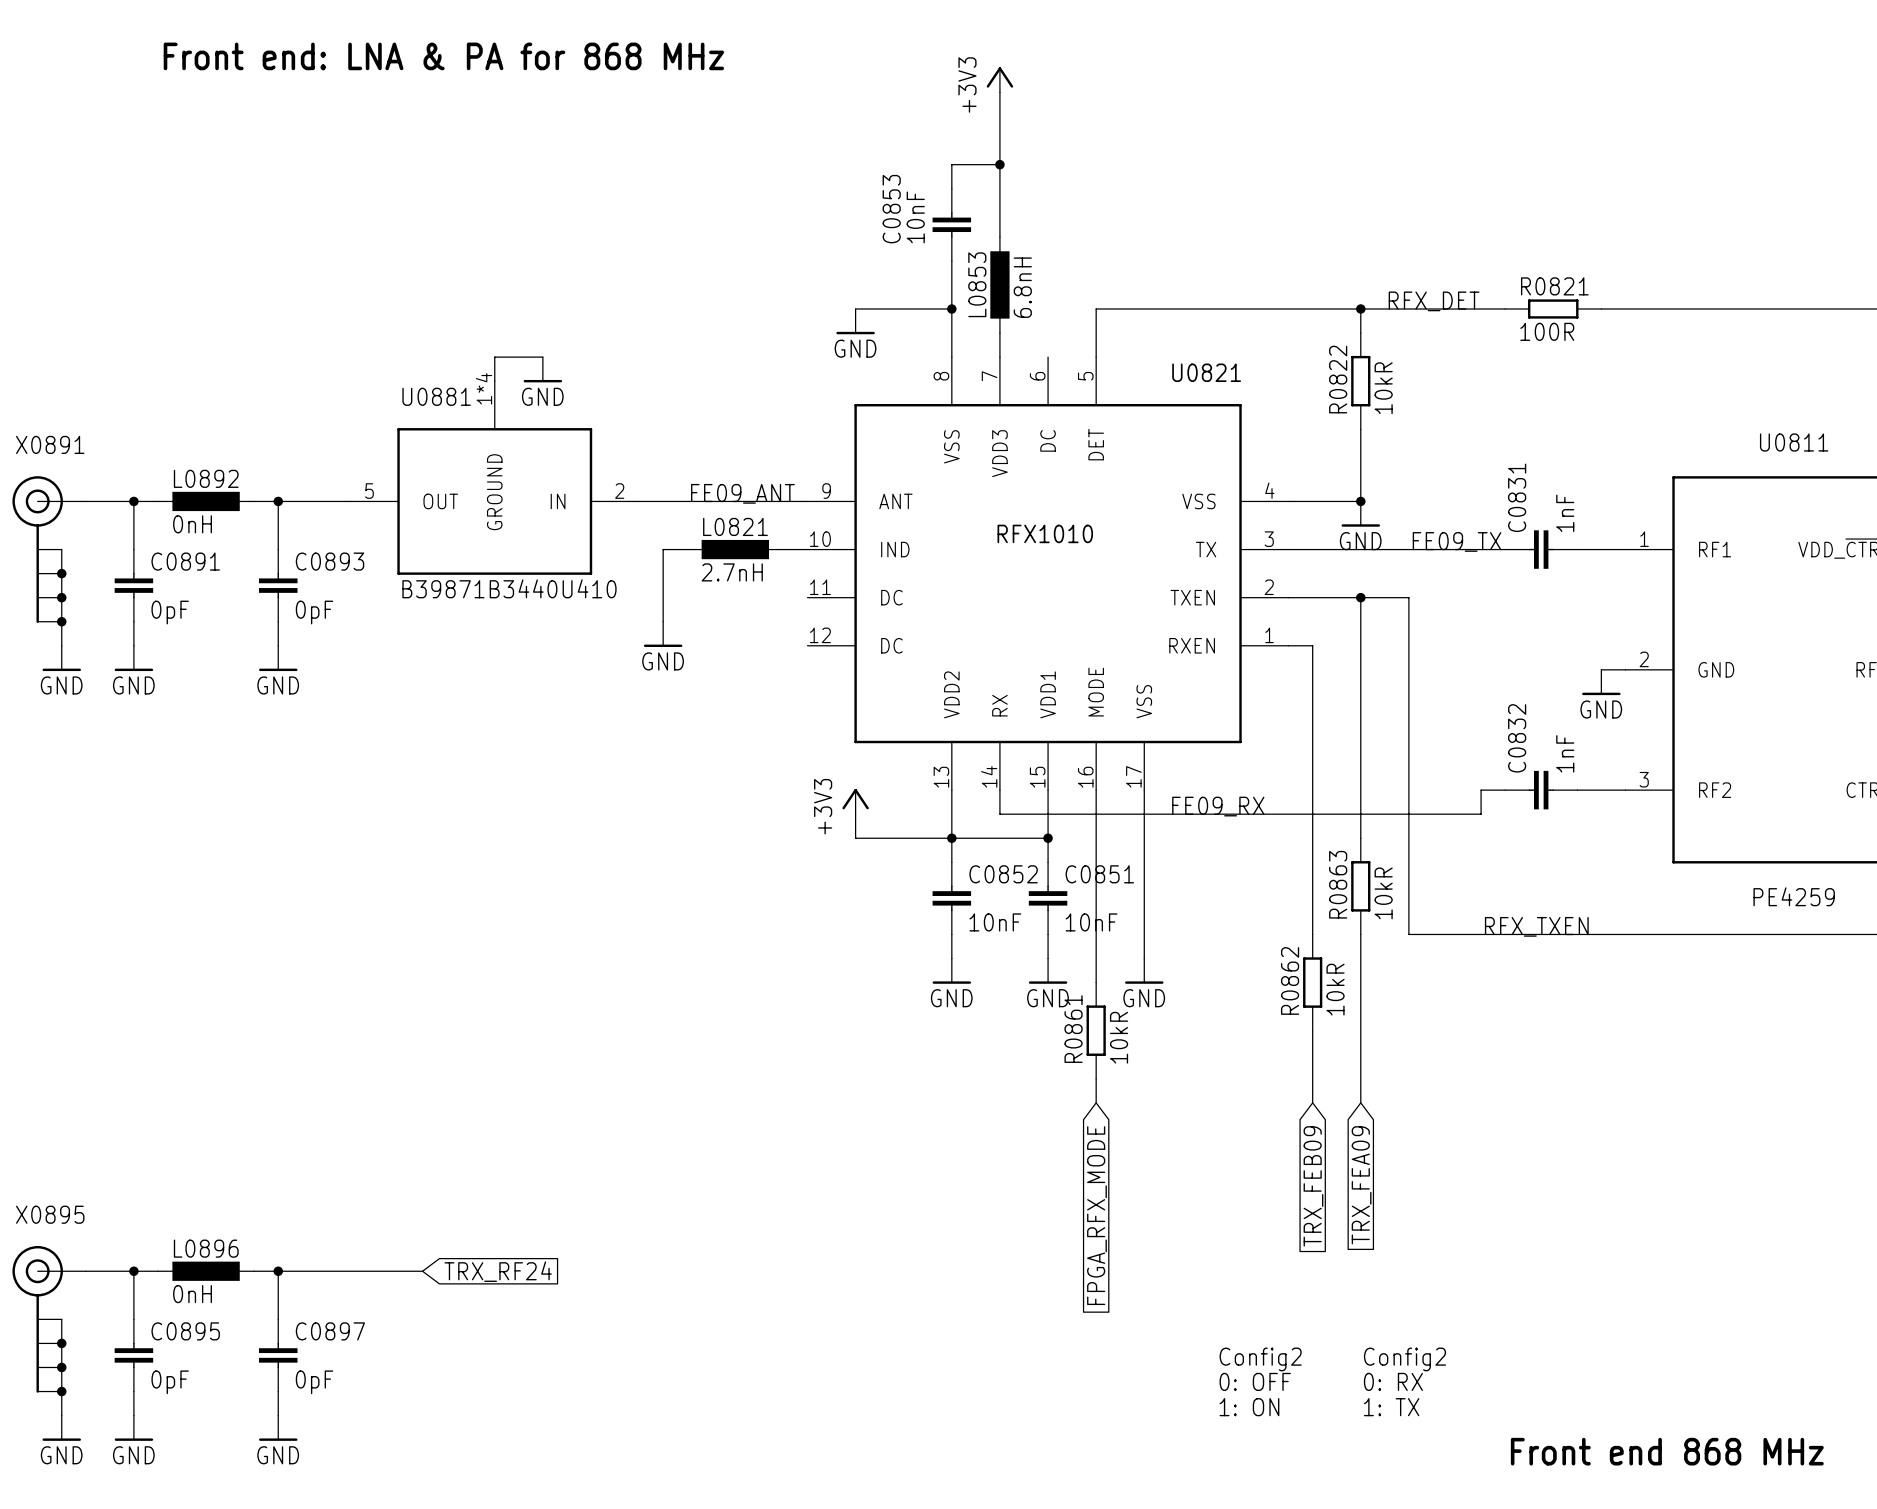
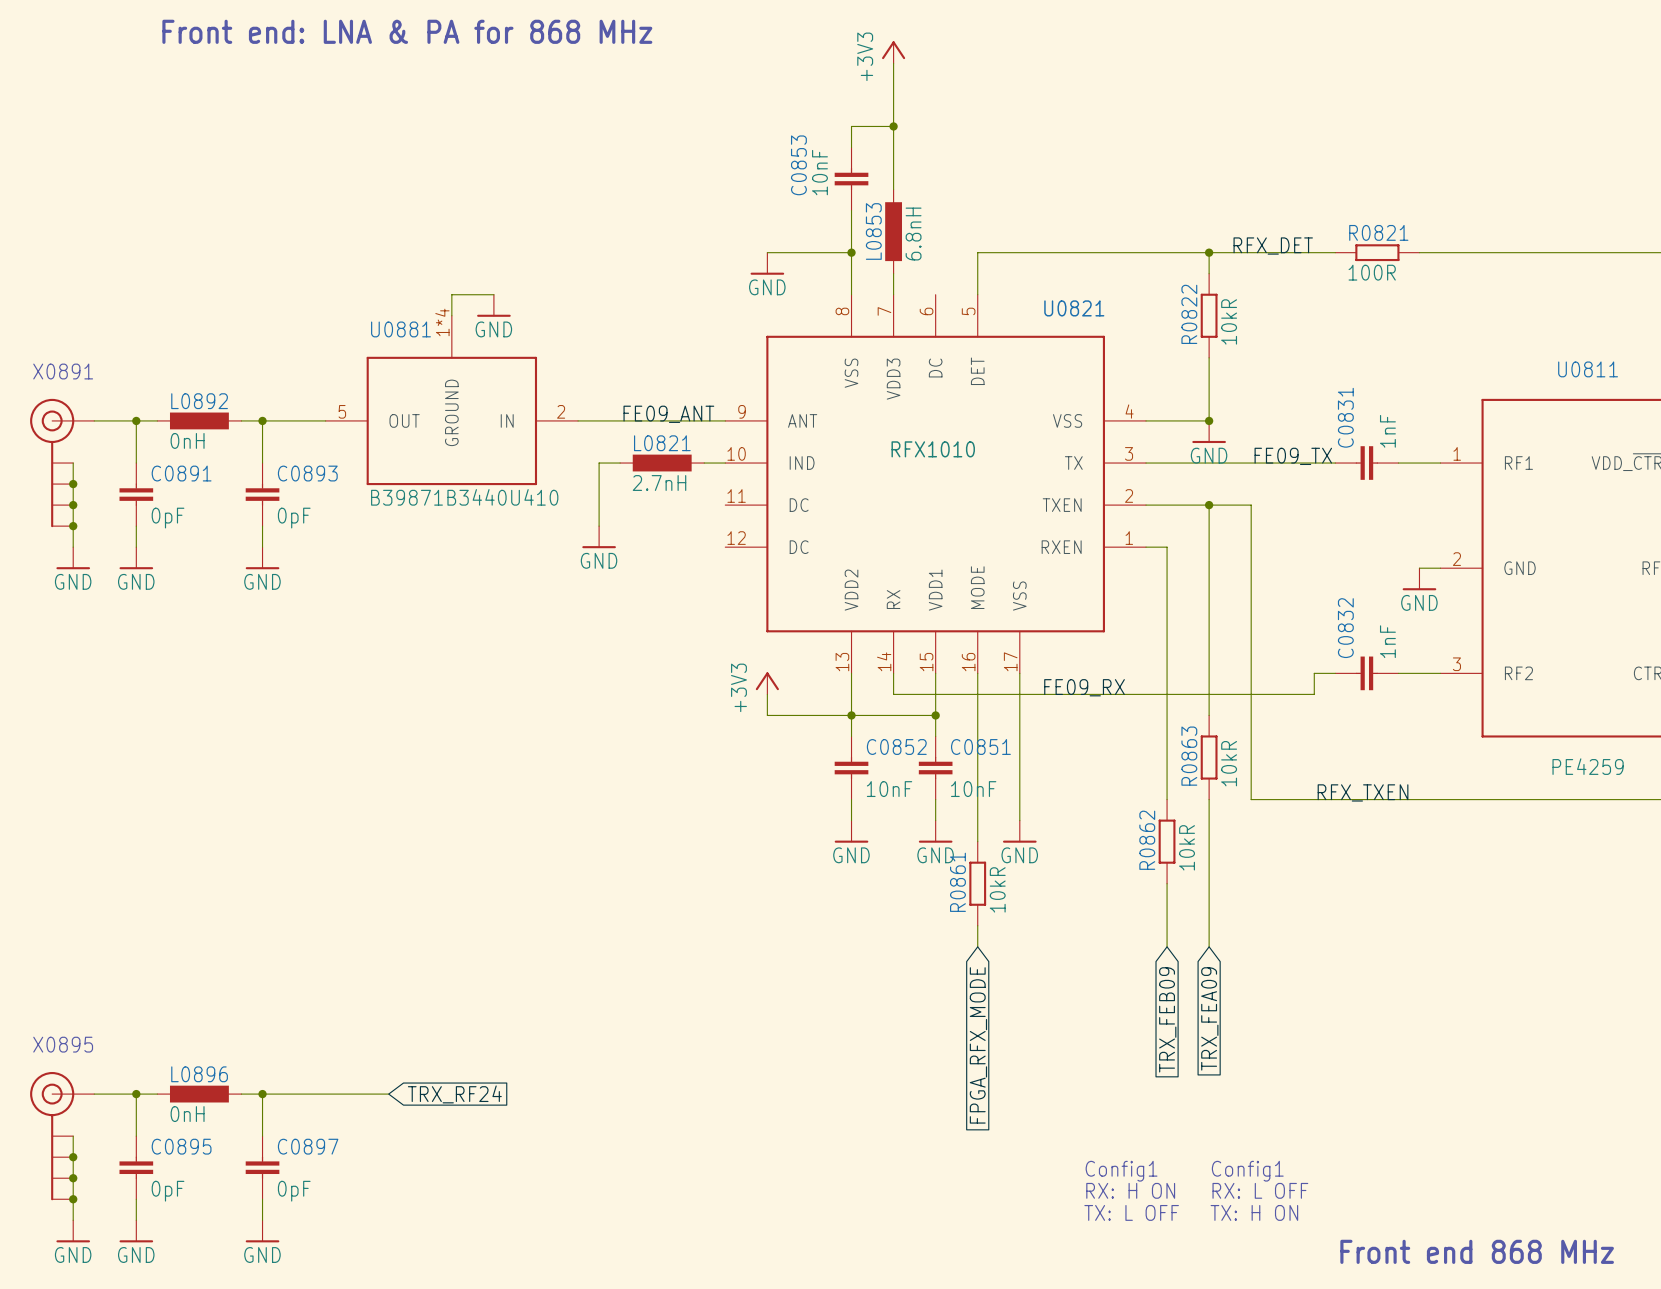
text: Config2 (1260, 1359) -> Config1 (1121, 1171)
text: Config2 (1404, 1359) -> Config1 (1247, 1171)
text: 0: OFF (1255, 1381) -> RX: H ON (1130, 1190)
text: 0: RX (1393, 1381) -> RX: L OFF (1260, 1190)
text: 1: ON (1249, 1407) -> TX: L OFF (1131, 1212)
text: 1: TX (1391, 1407) -> TX: H ON (1254, 1212)

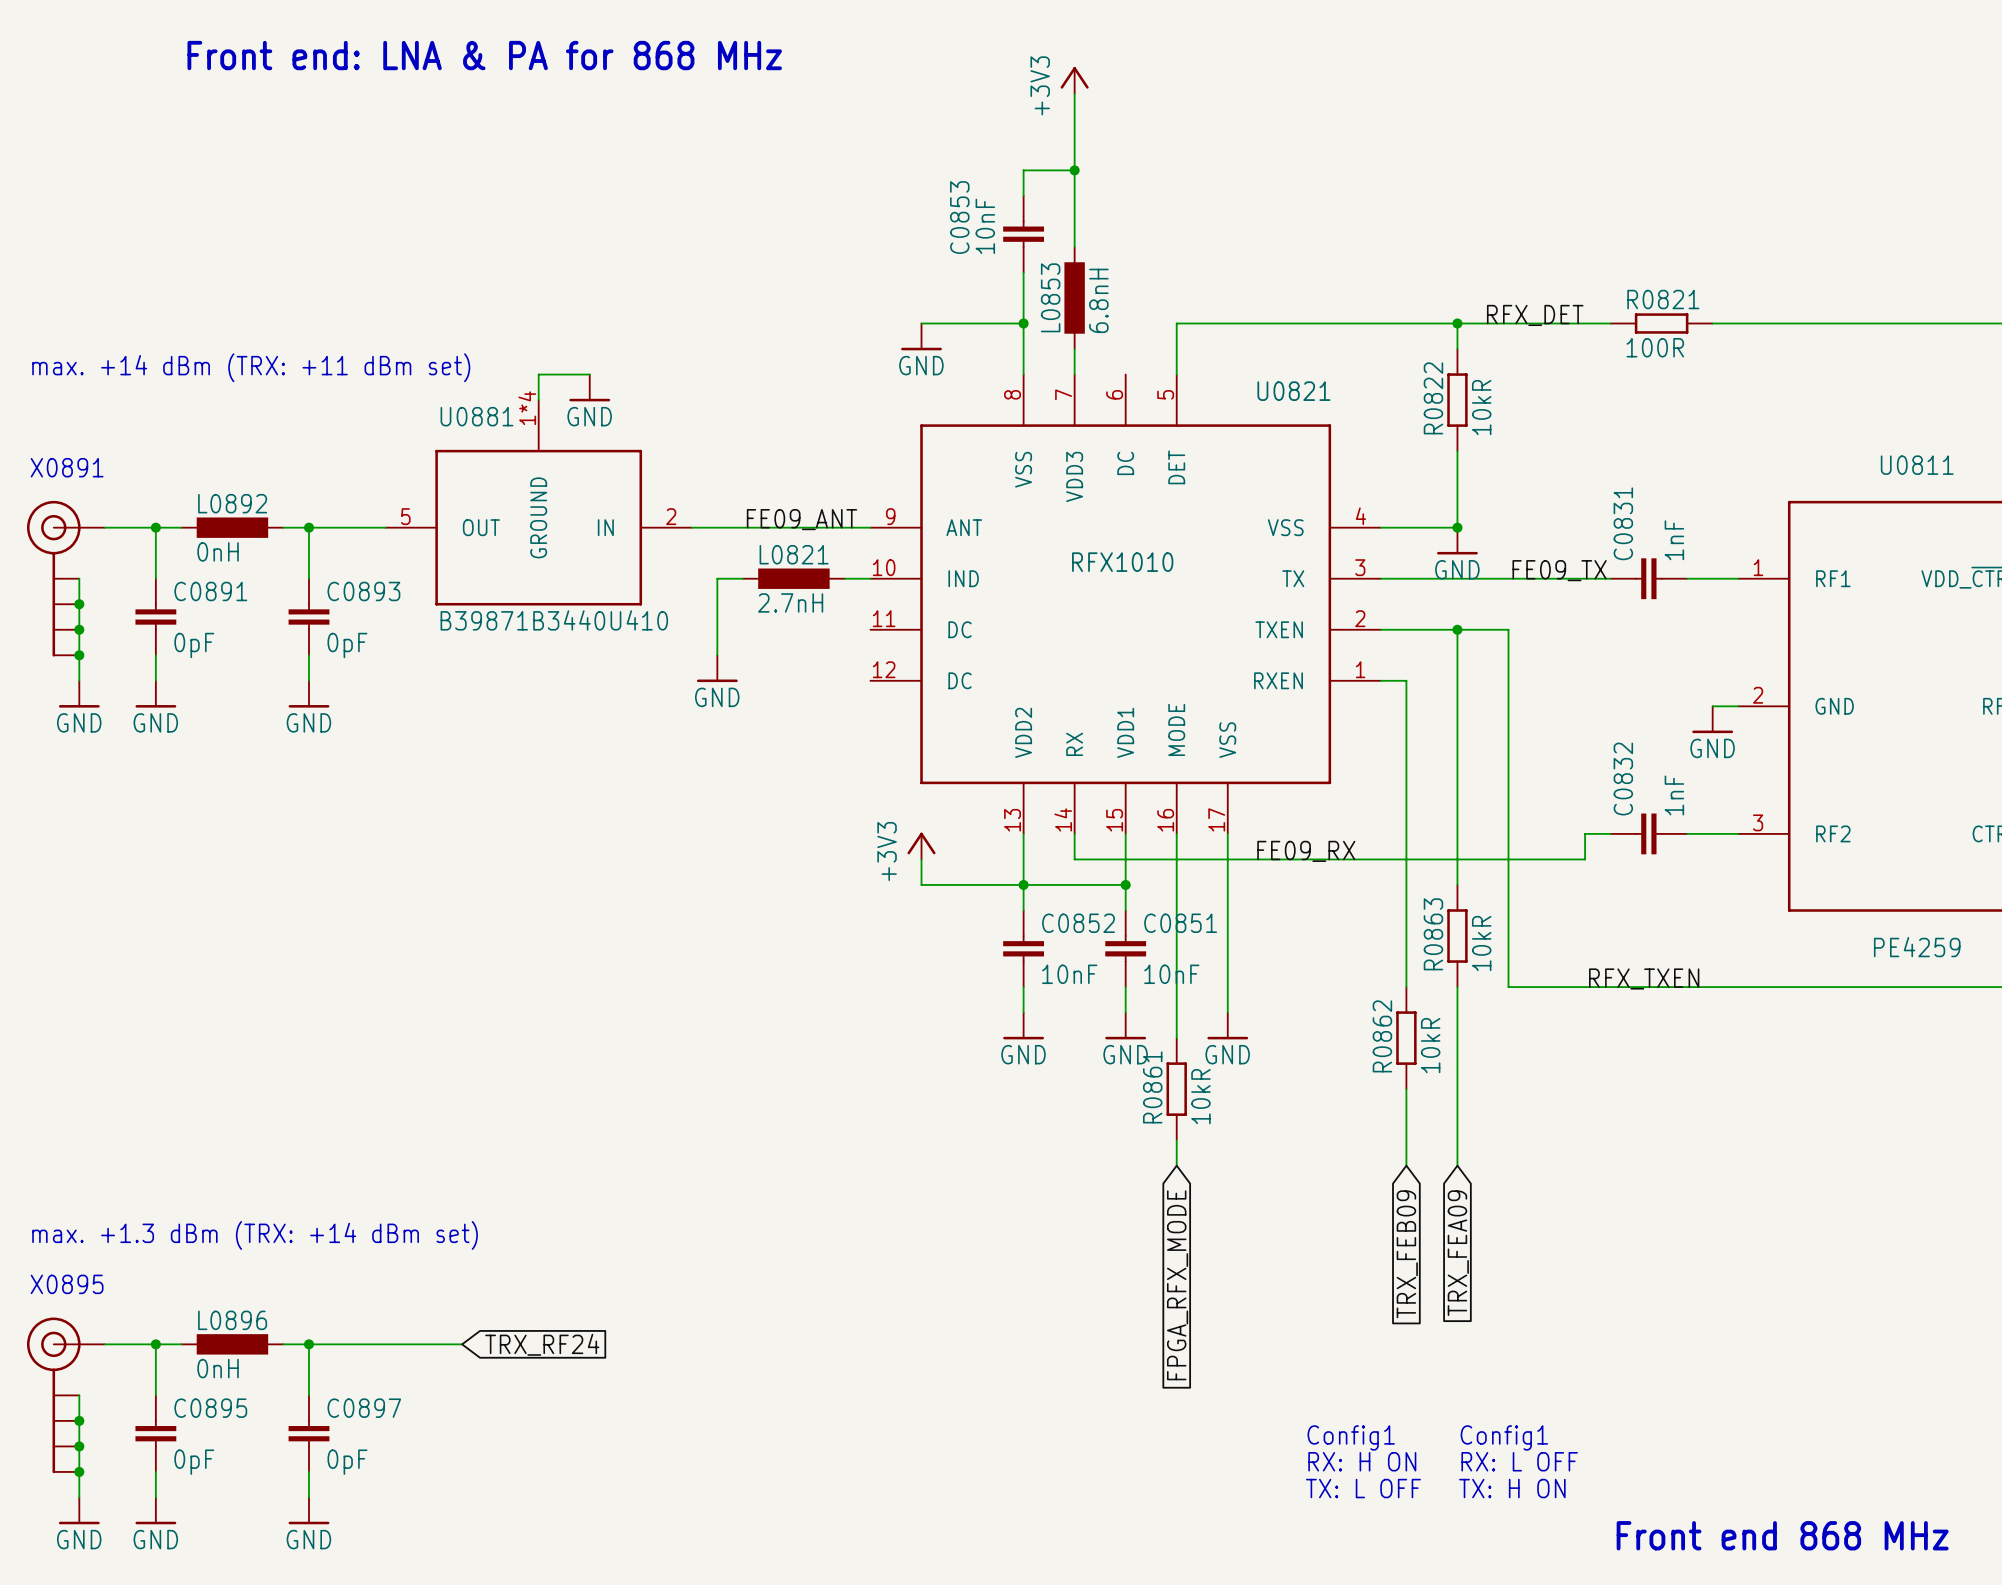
text: none -> max. +14 dBm (TRX: +11 dBm set) (251, 367)
text: none -> max. +1.3 dBm (TRX: +14 dBm set) (255, 1235)

